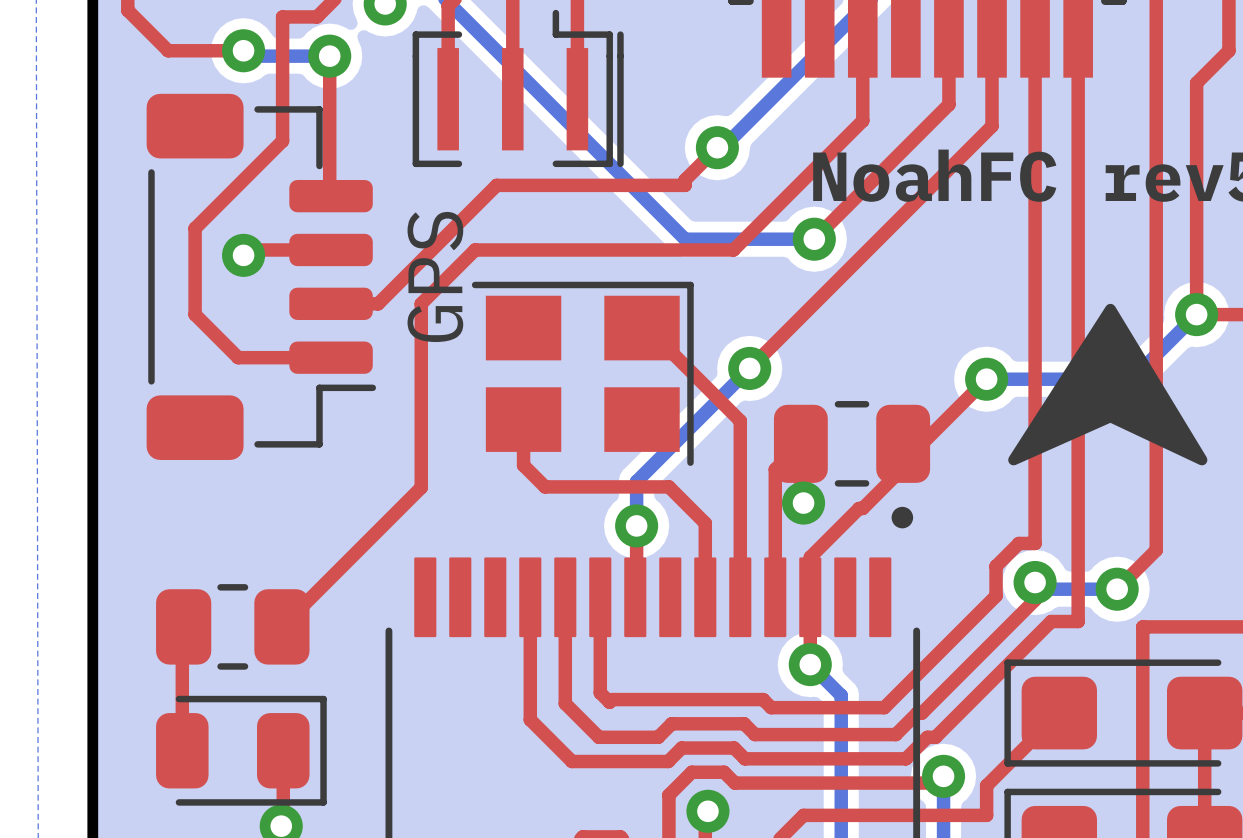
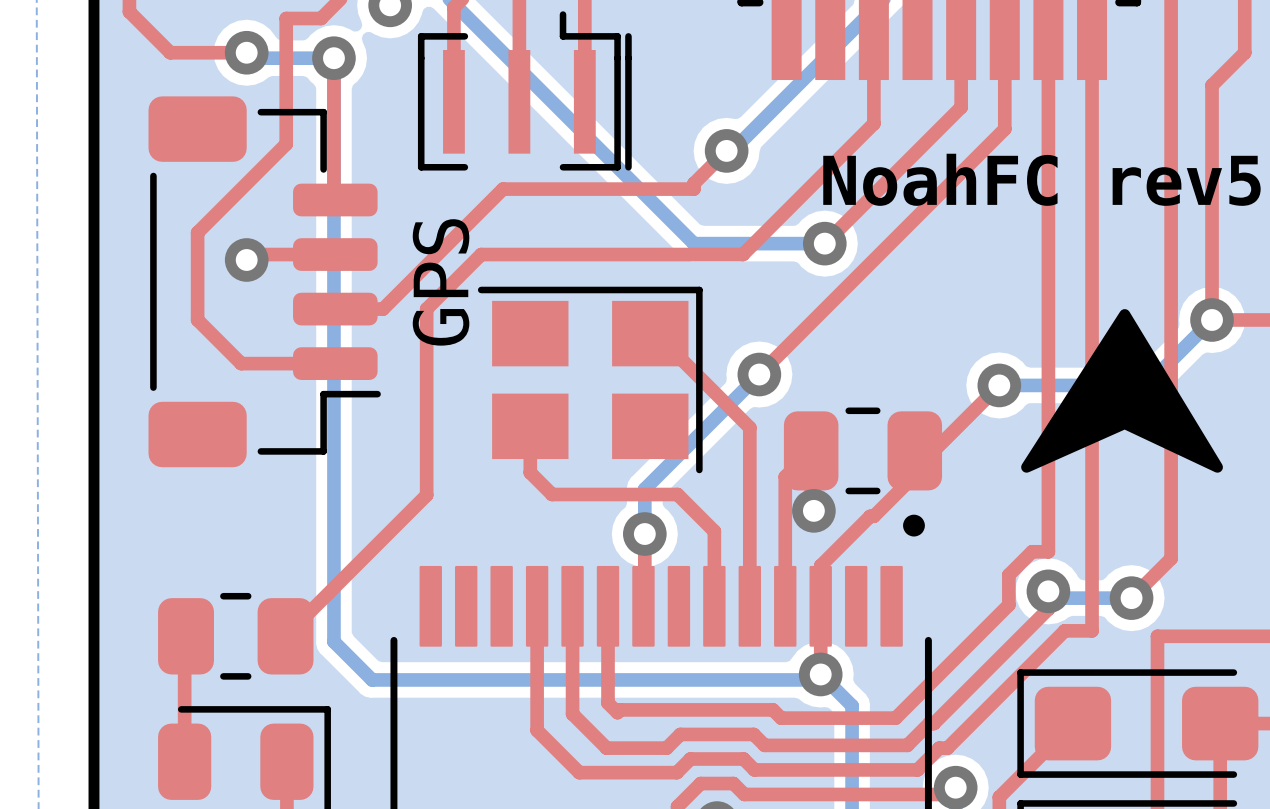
bottom track: none -> (333, 58) (333, 641) (372, 679) (815, 679) (820, 674)

